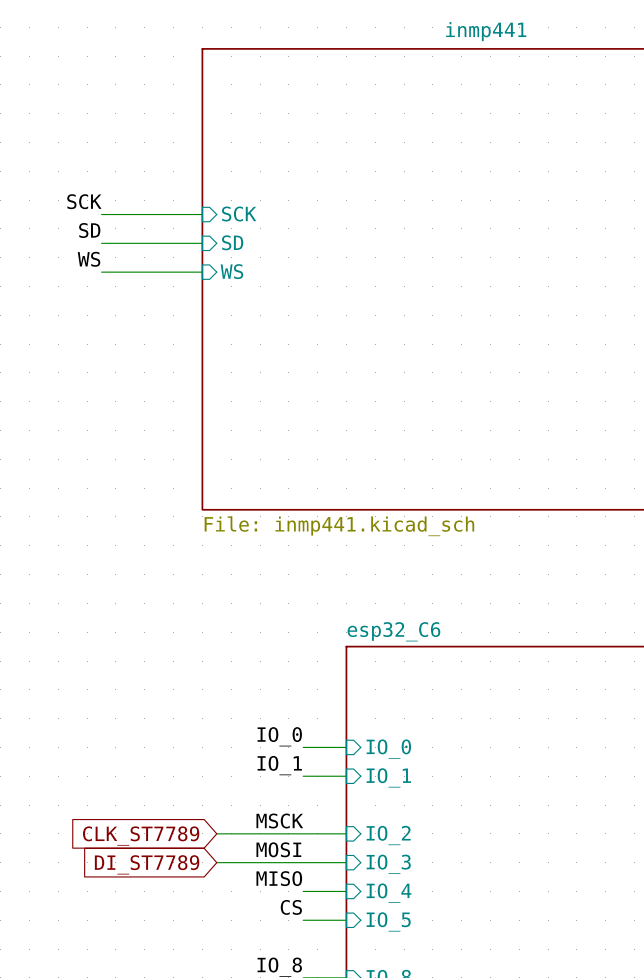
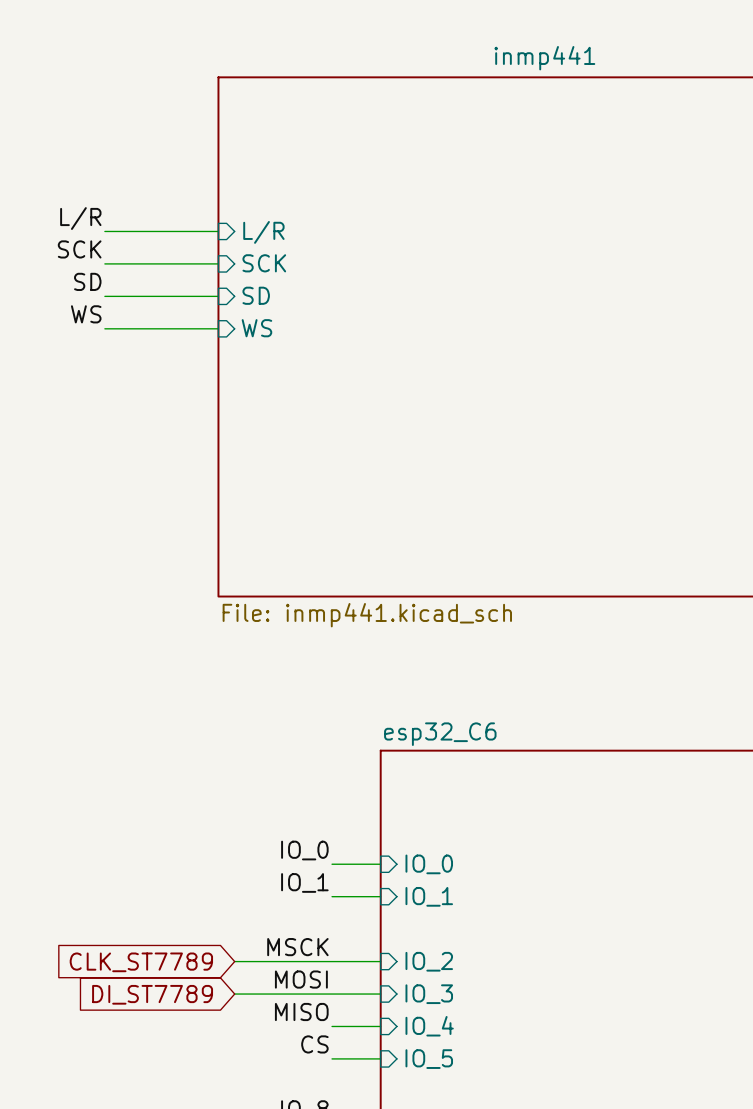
label: none -> L/R (80, 218)
wire: none -> (104, 231) (218, 231)
sheet pin: none -> L/R (263, 232)

